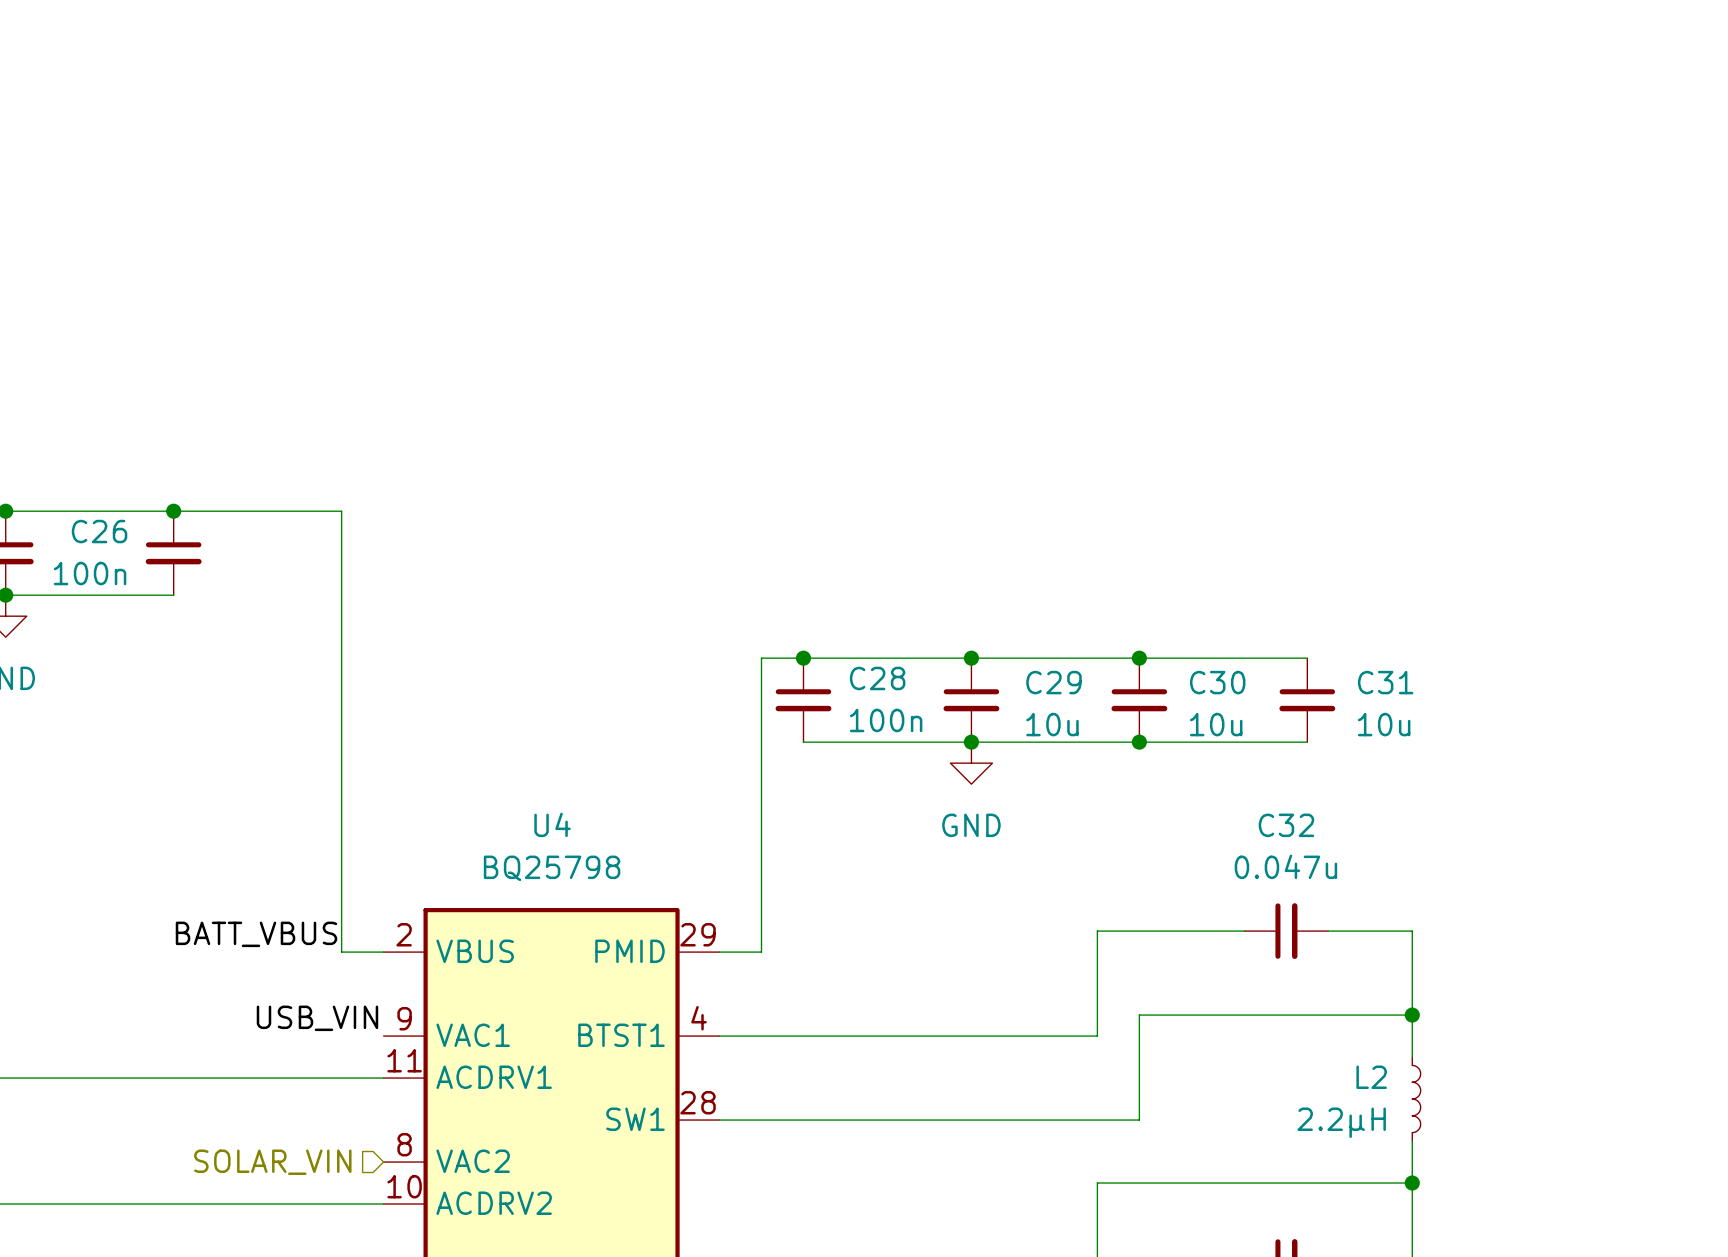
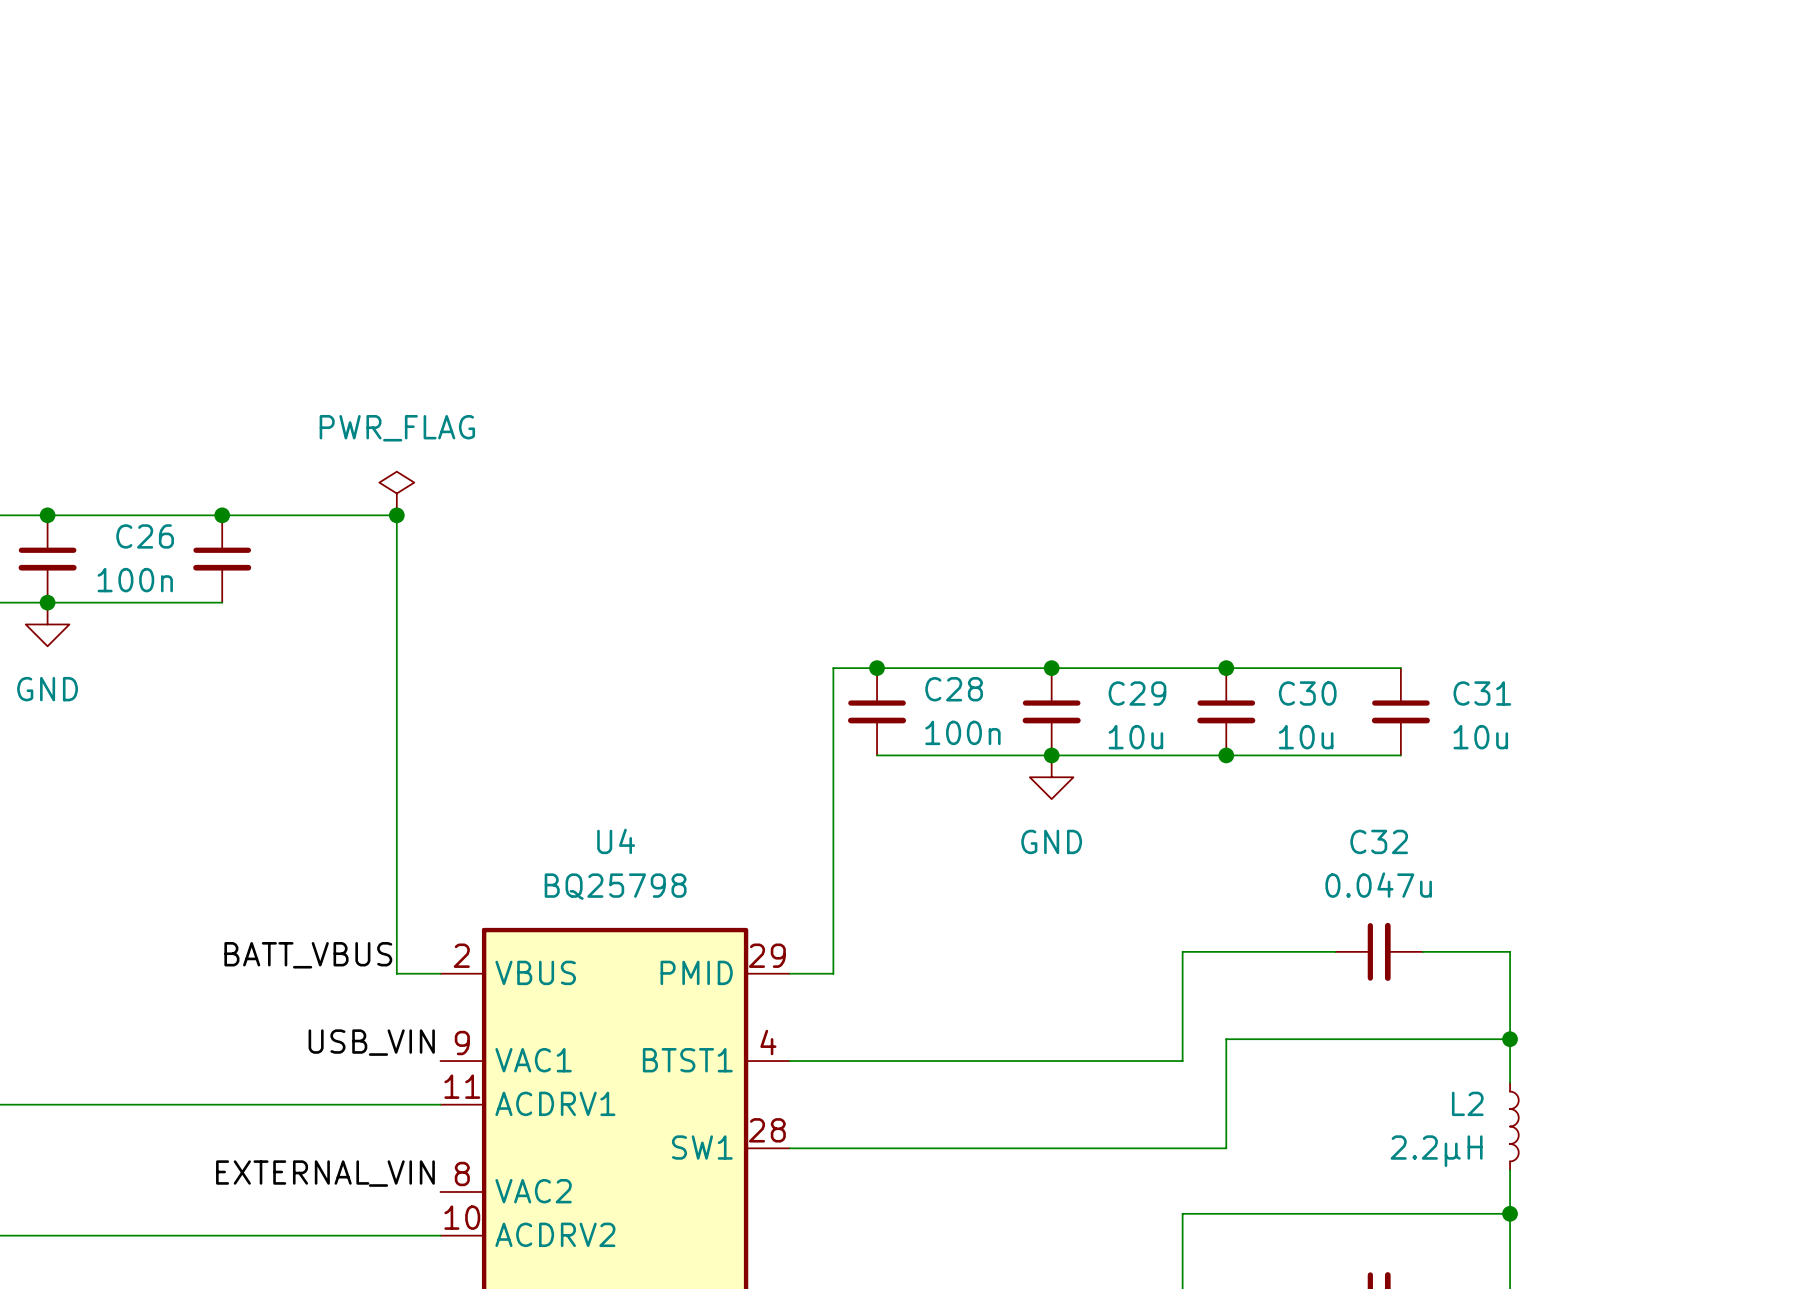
power symbol: none -> PWR_FLAG (396, 493)
junction: none -> (396, 515)
label: none -> EXTERNAL_VIN (325, 1173)
hierarchical label: SOLAR_VIN (272, 1162) -> none

